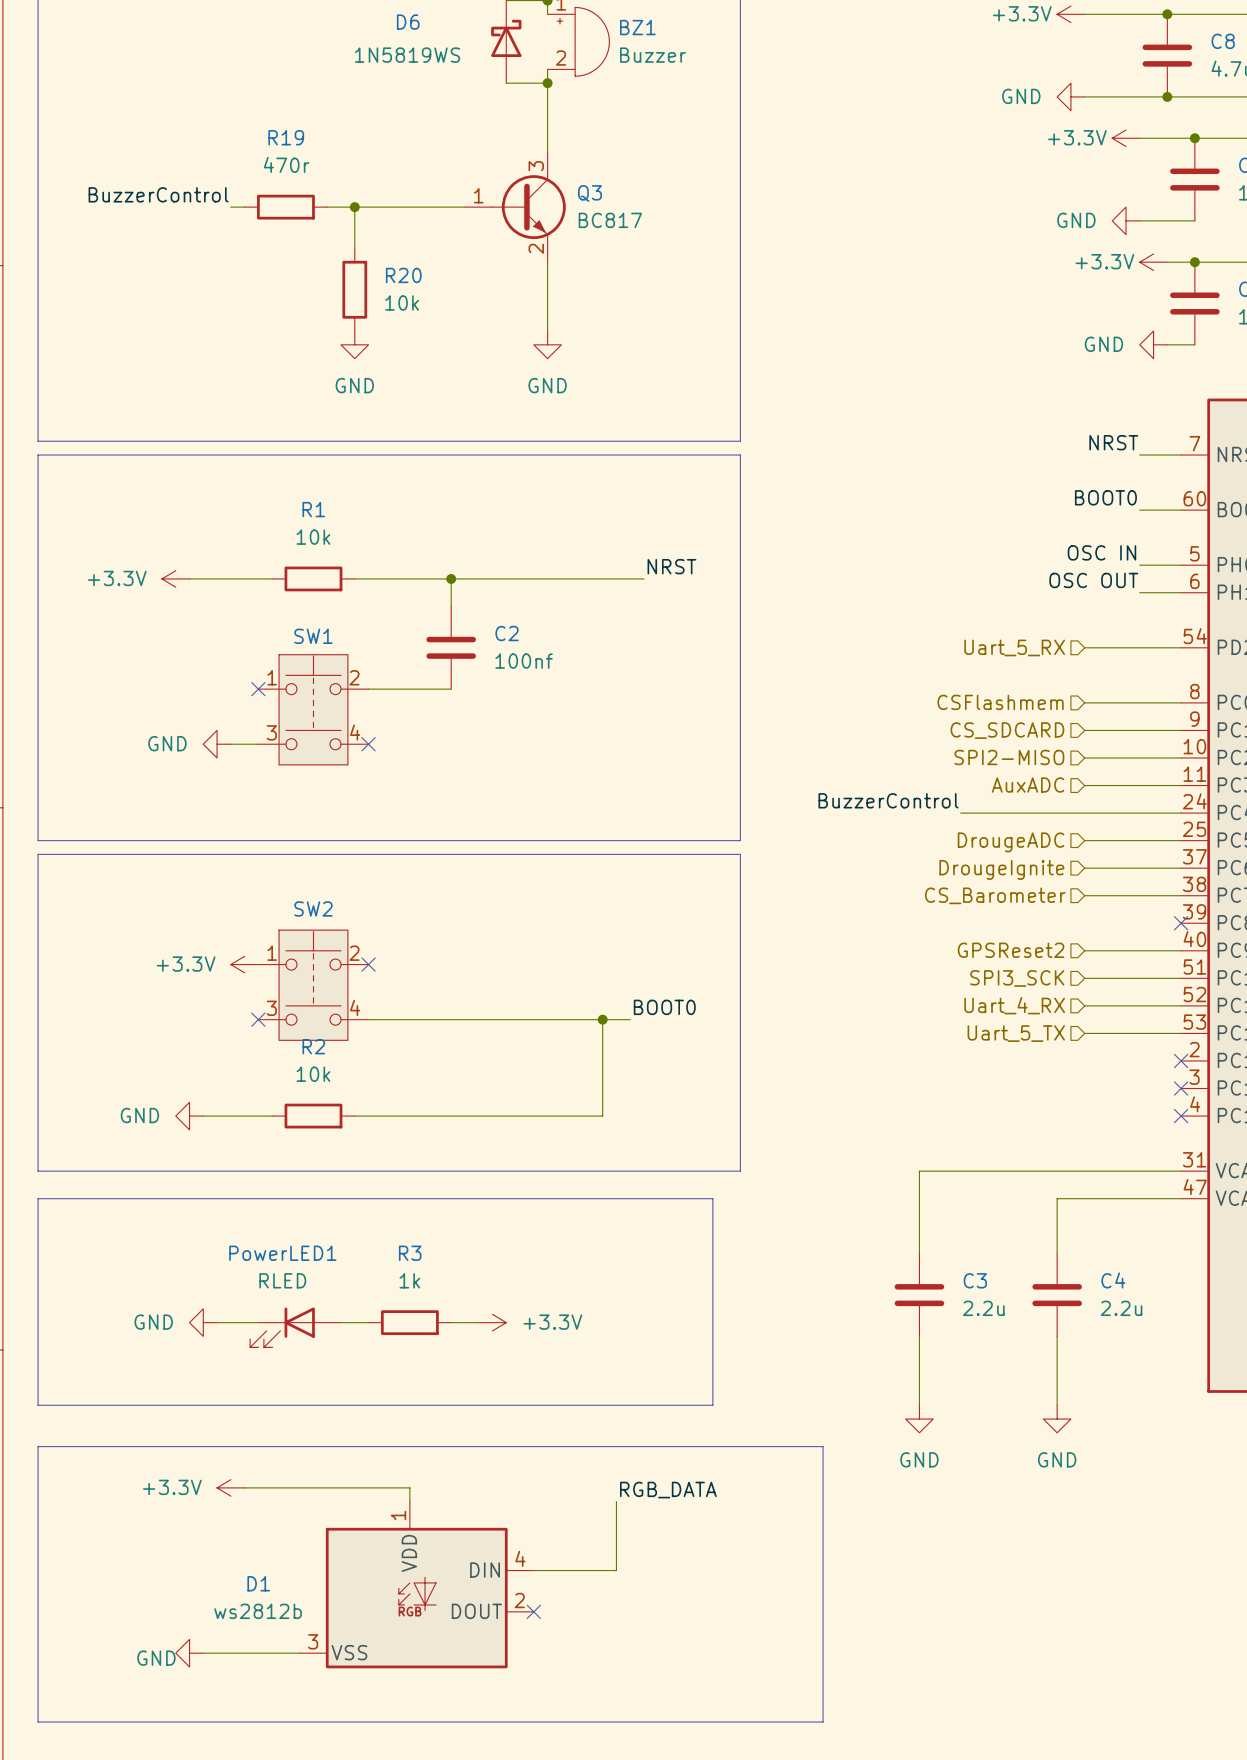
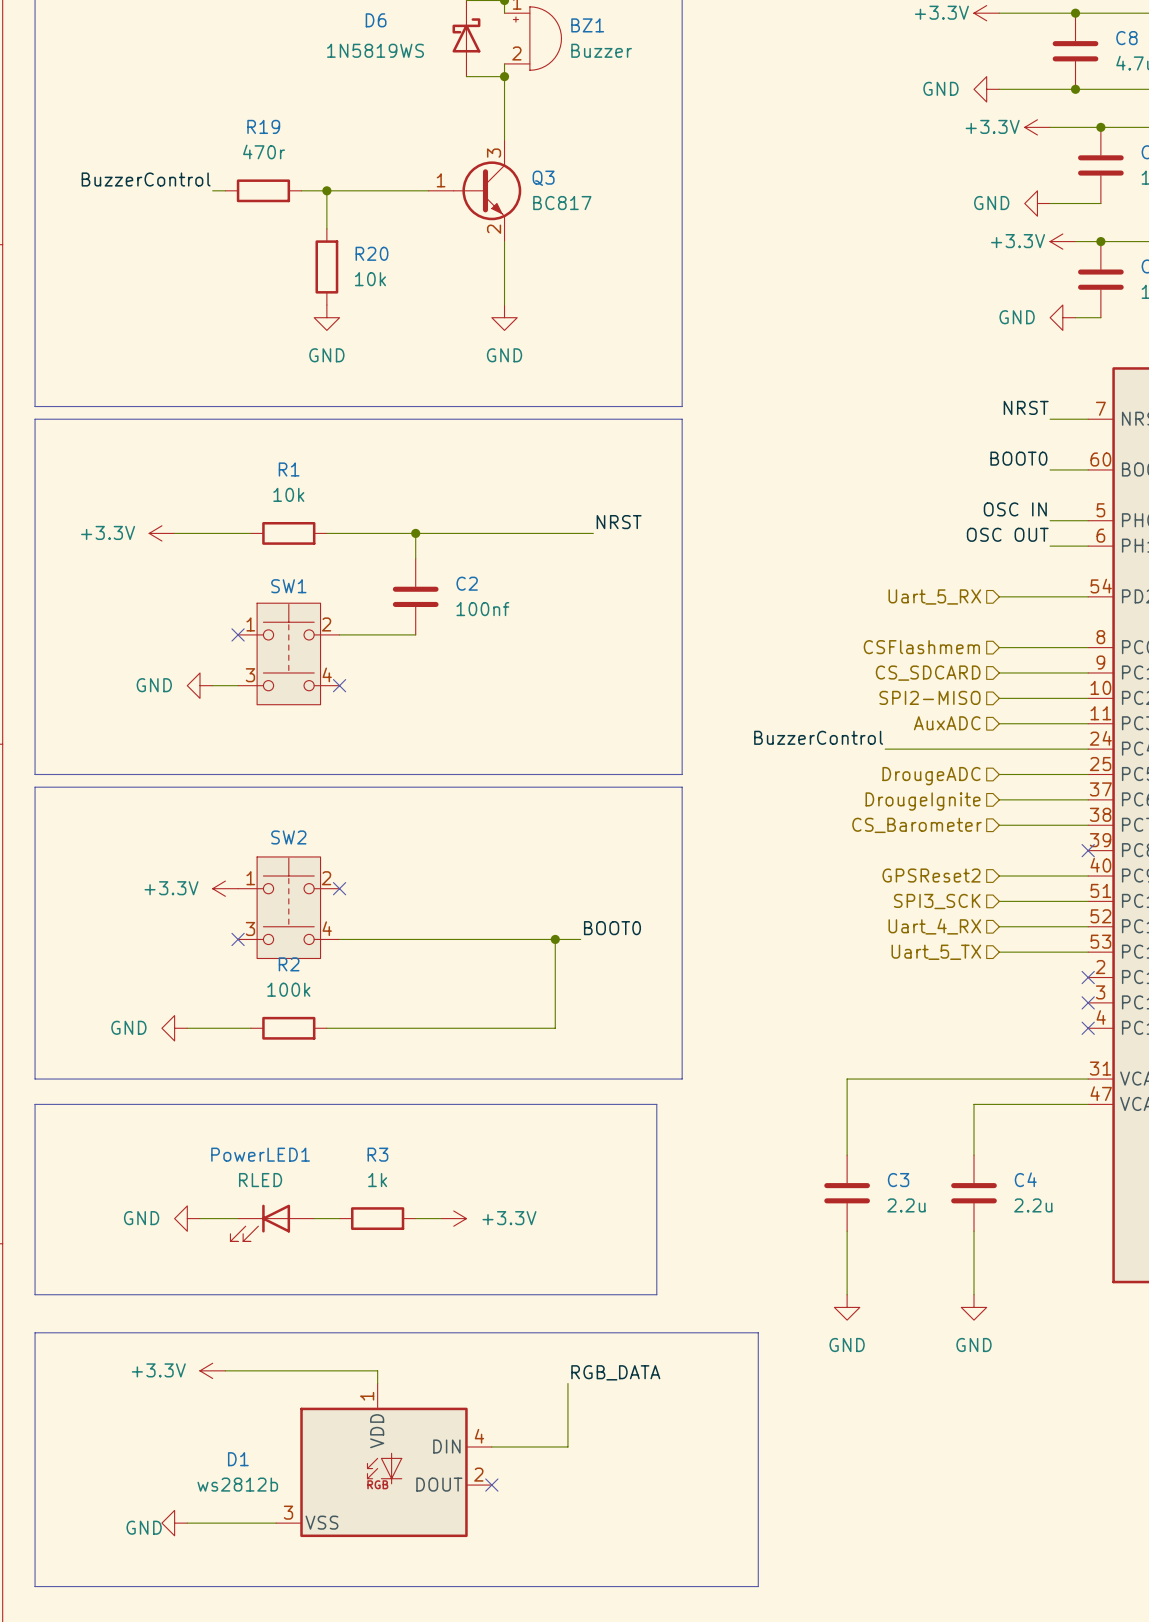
R2 value: 10k (313, 1074) -> 100k (288, 989)

